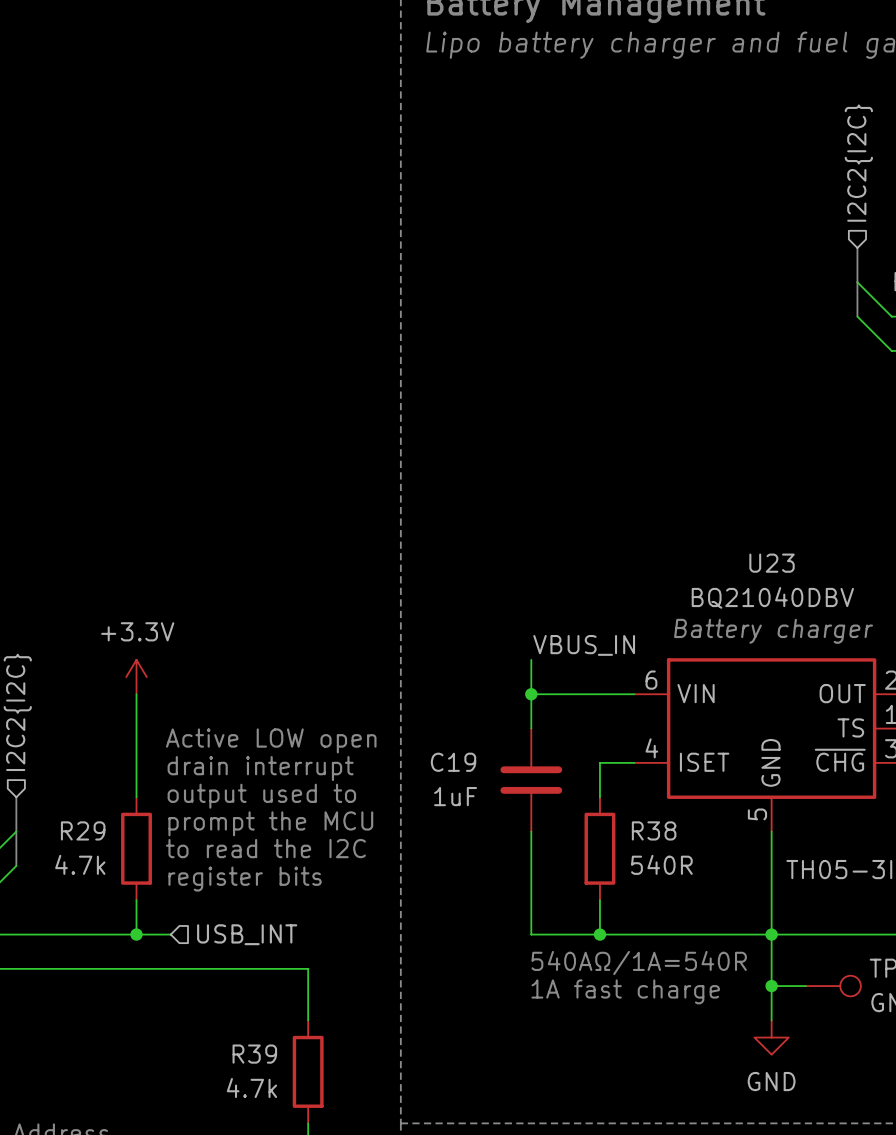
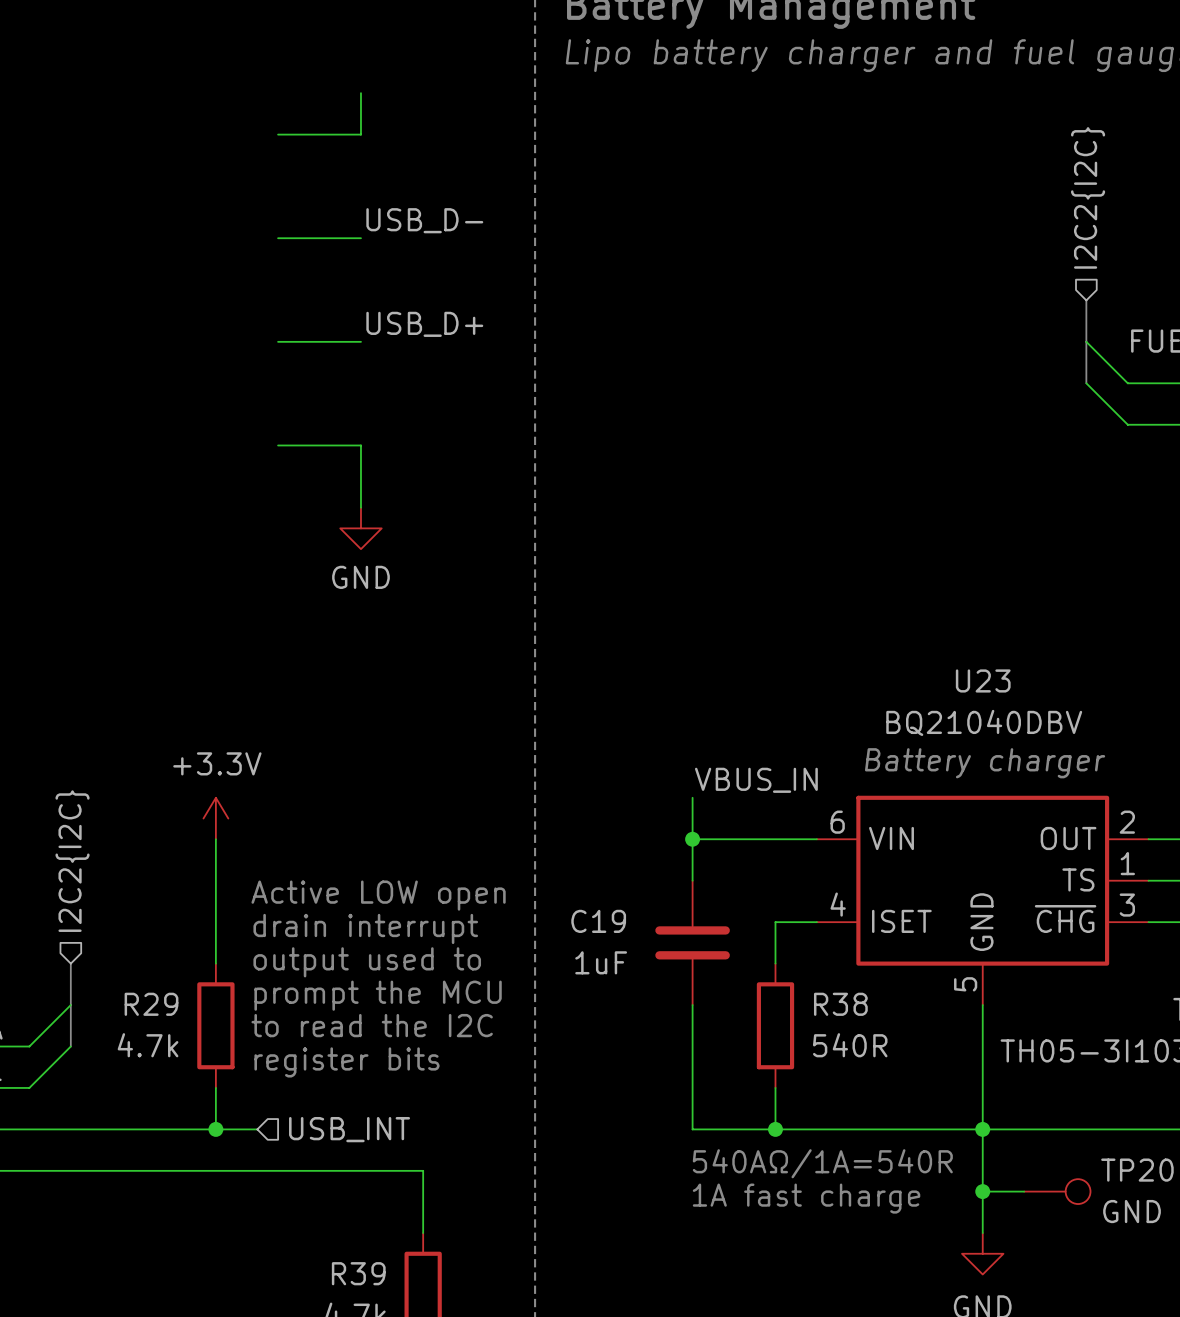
wire: none -> (360, 93) (360, 134) (278, 134)
label: none -> USB_D- (424, 220)
wire: none -> (278, 238) (360, 238)
label: none -> USB_D+ (424, 324)
wire: none -> (278, 341) (360, 341)
wire: none -> (278, 445) (360, 445) (360, 507)
power symbol: none -> GND (360, 528)

